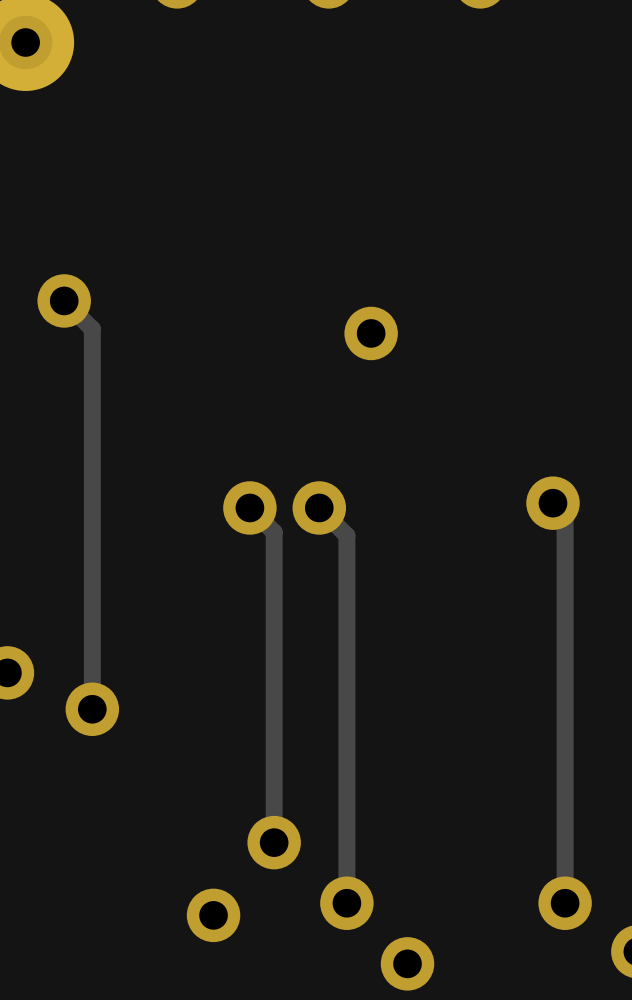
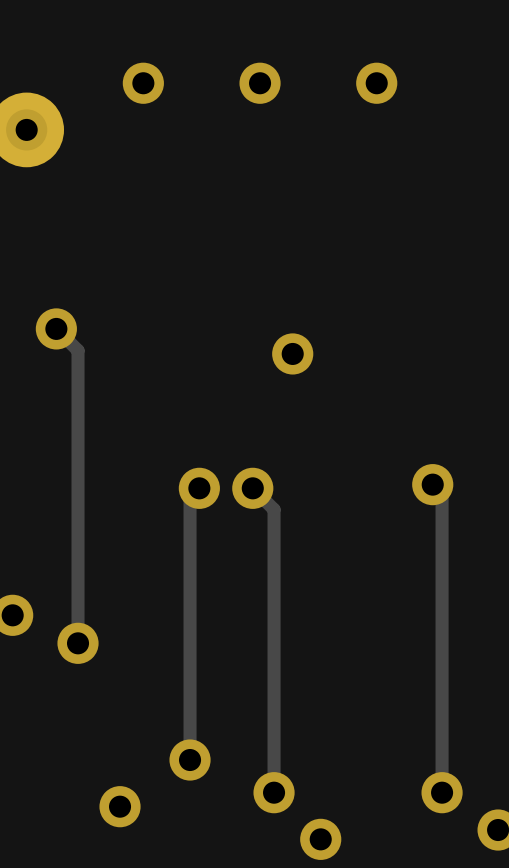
track: (249, 507) (274, 532) (274, 842) -> (199, 488) (190, 497) (190, 760)
via position: (274, 842) -> (190, 760)
via: (213, 915) -> none
via: none -> (120, 806)

